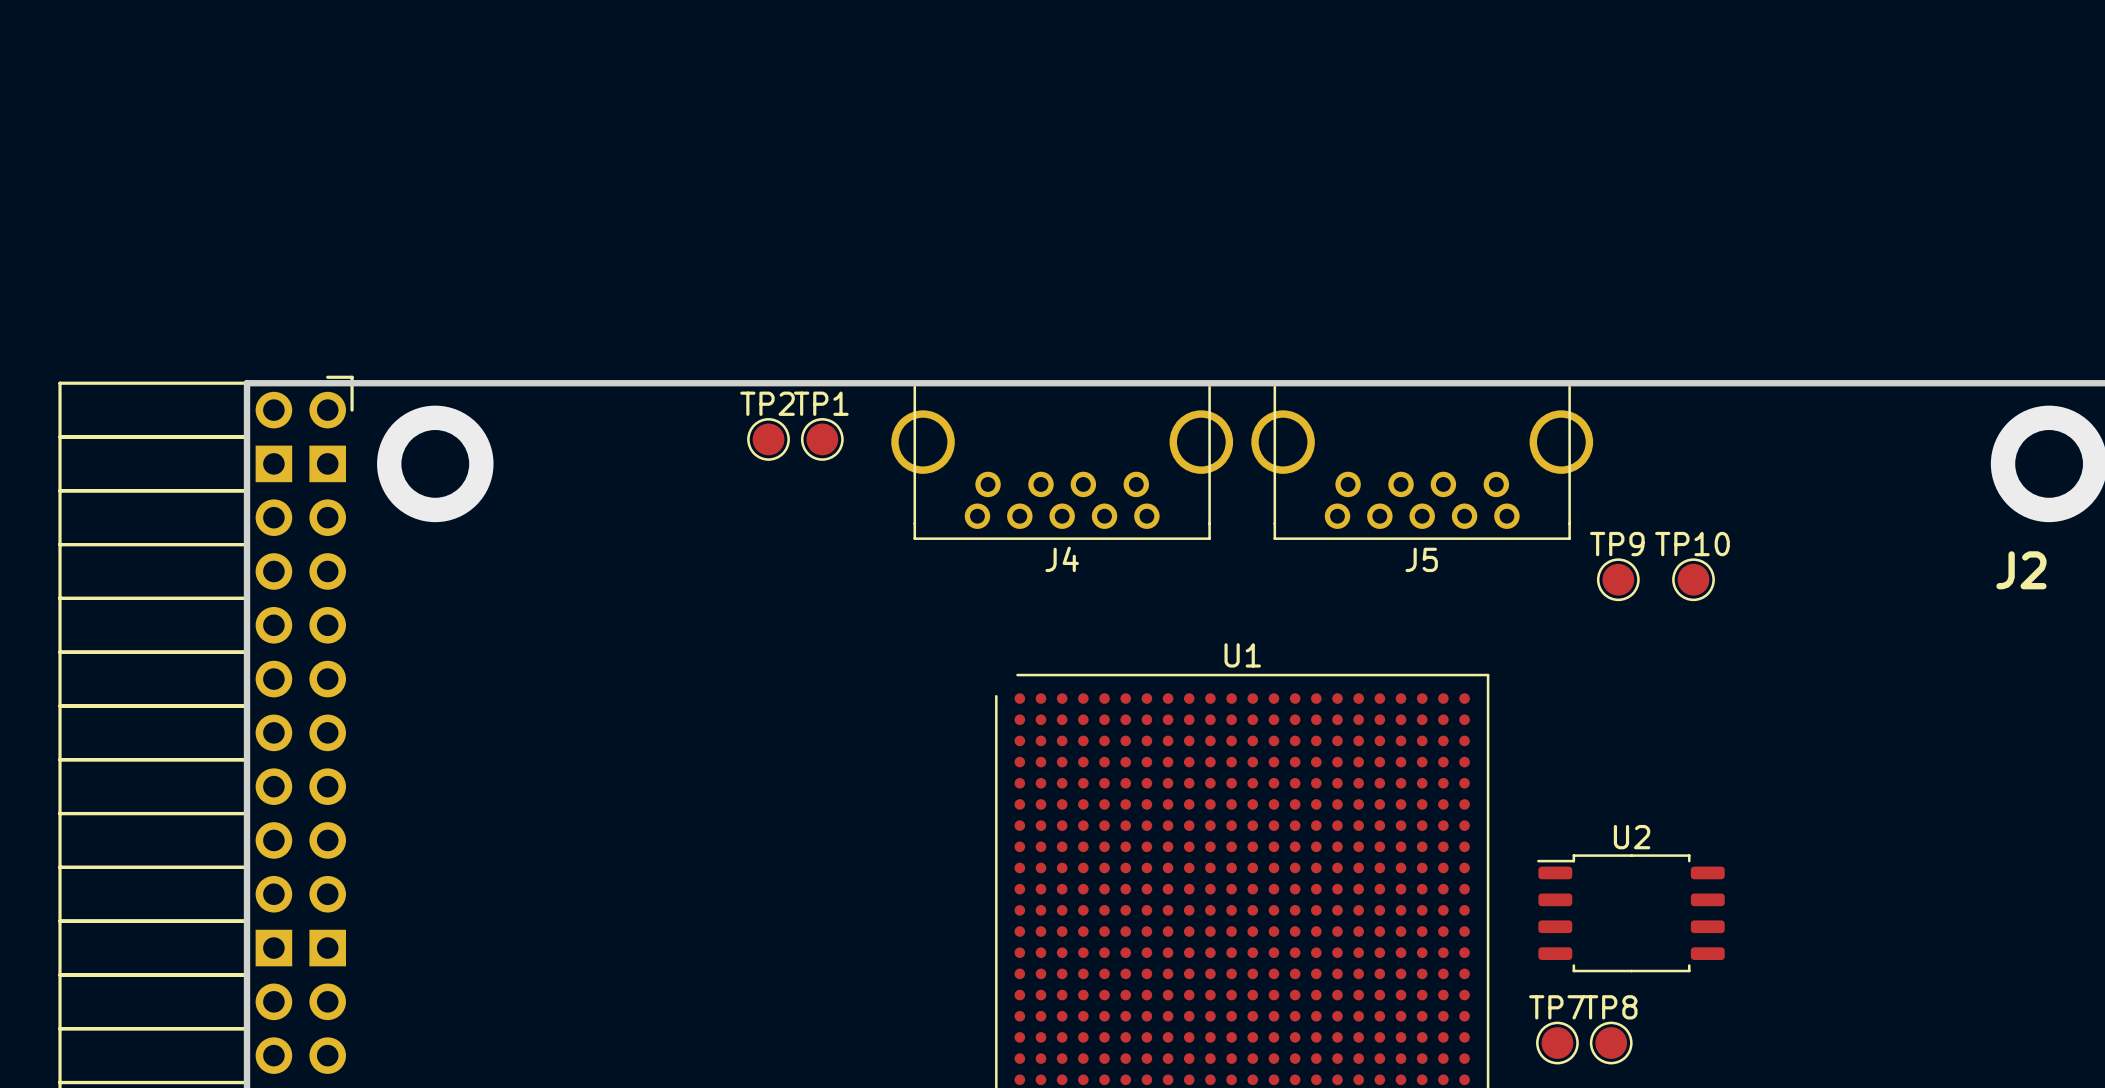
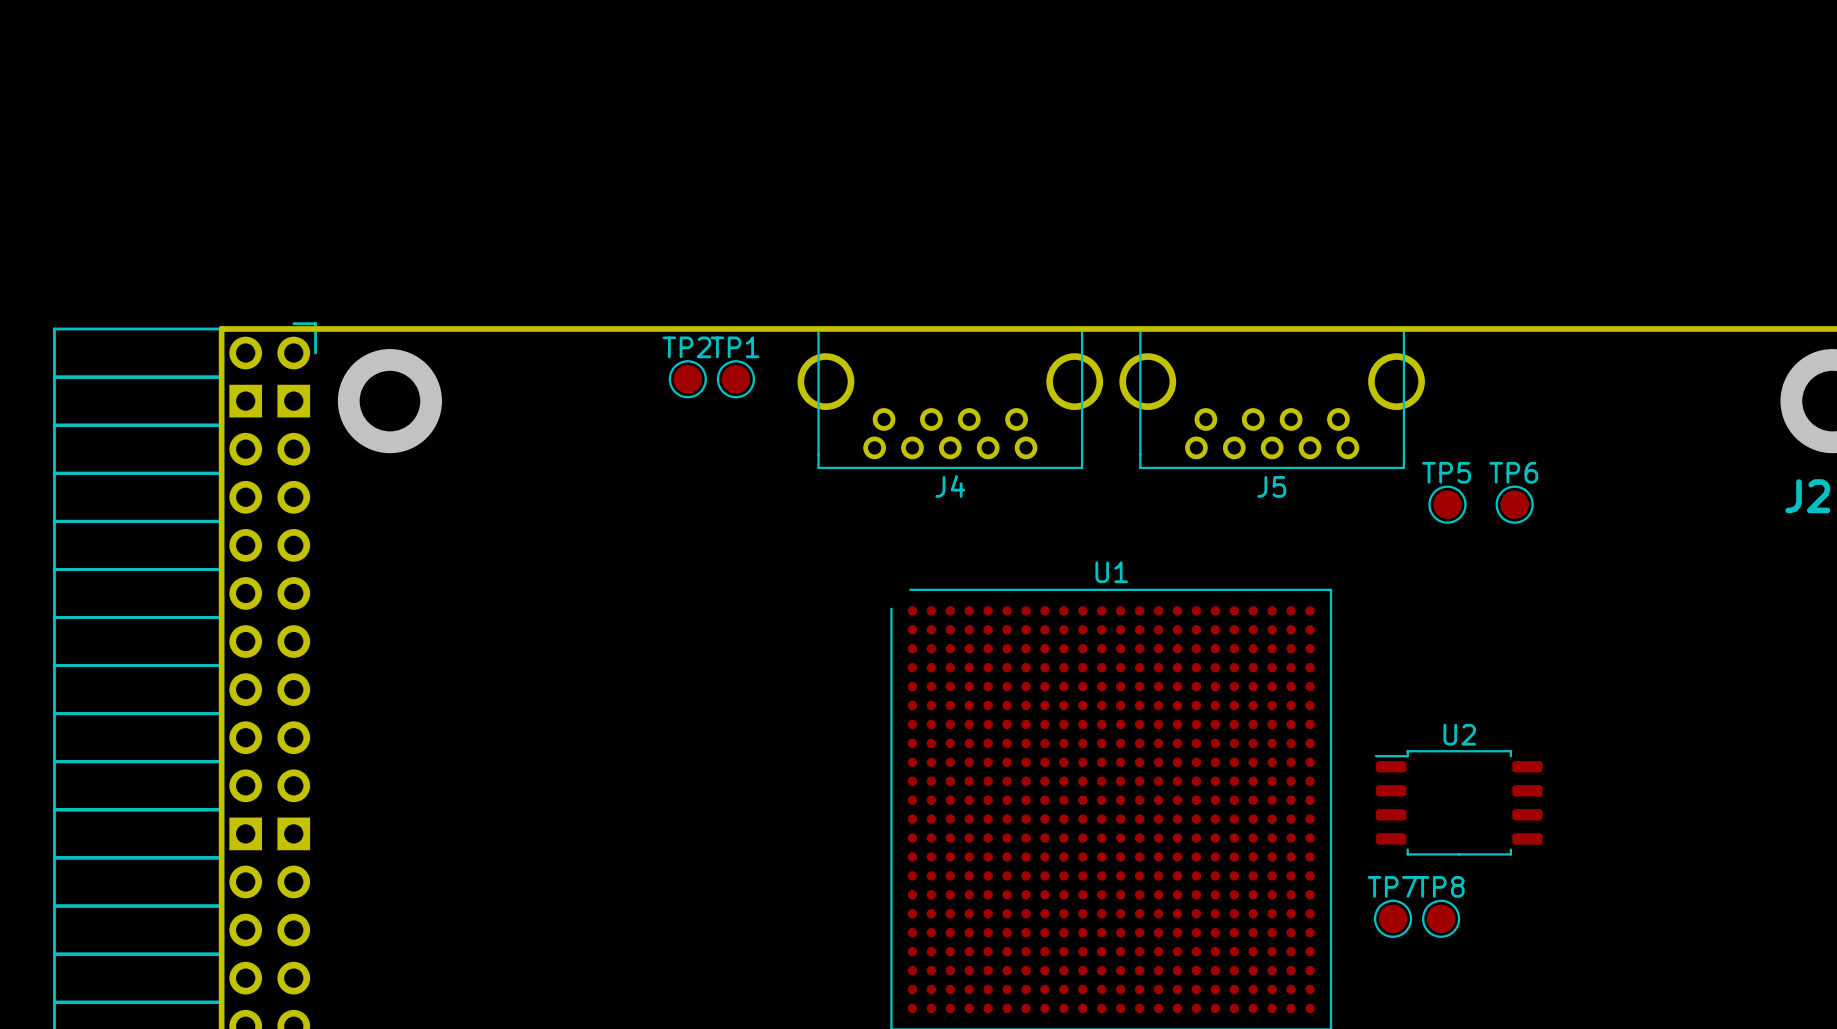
TP9 name: TP9 (1617, 544) -> TP5 (1446, 472)
TP10 name: TP10 (1692, 544) -> TP6 (1513, 472)

